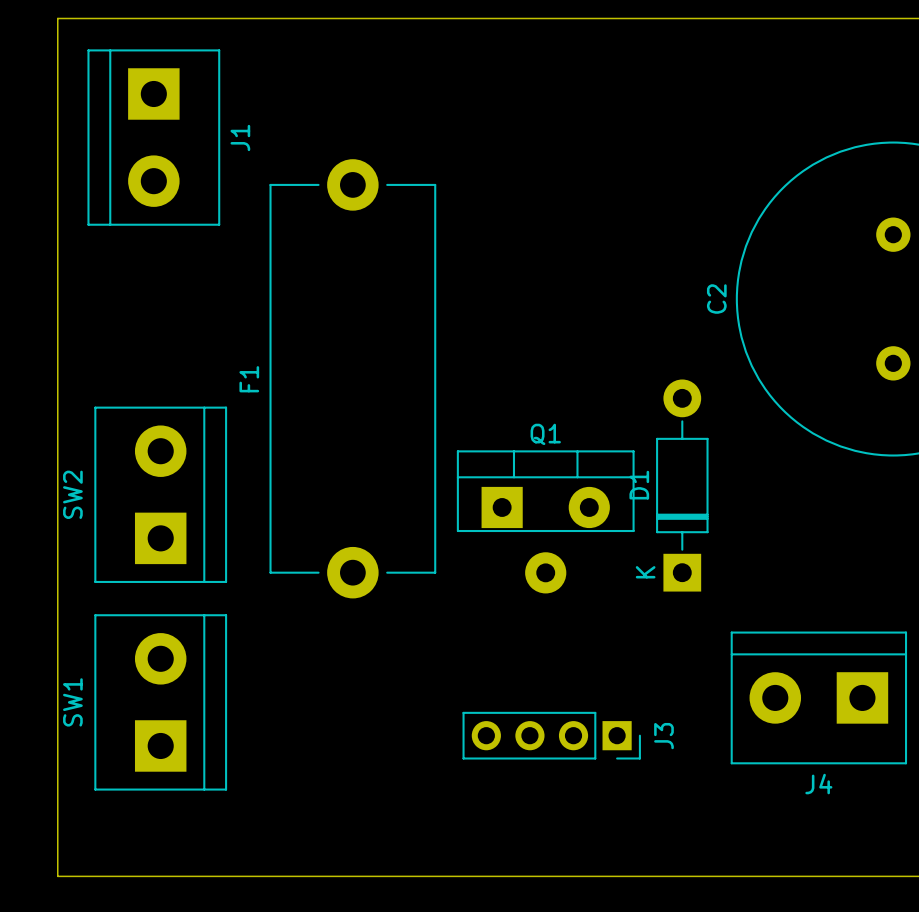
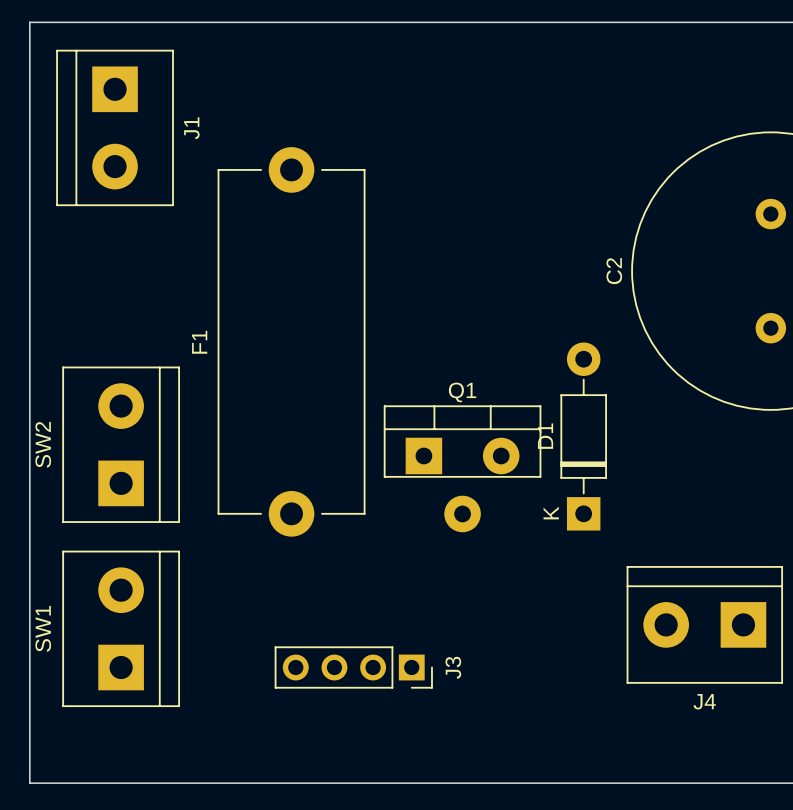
J3 position: (551, 735) -> (353, 667)

